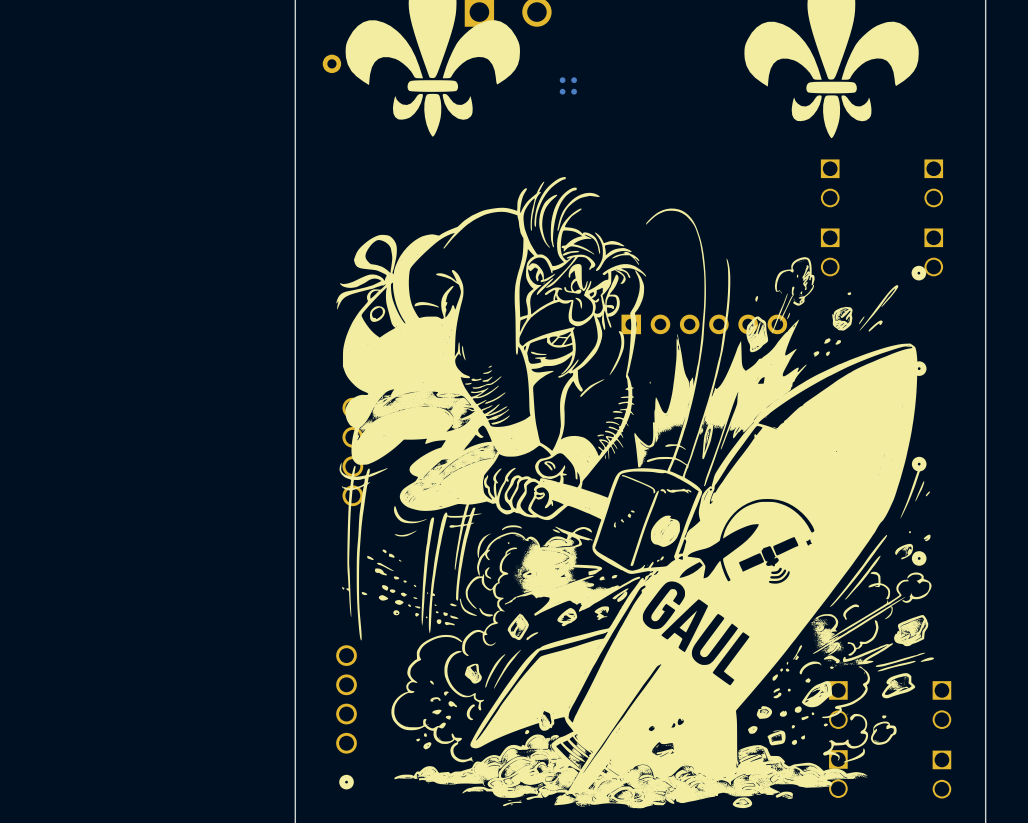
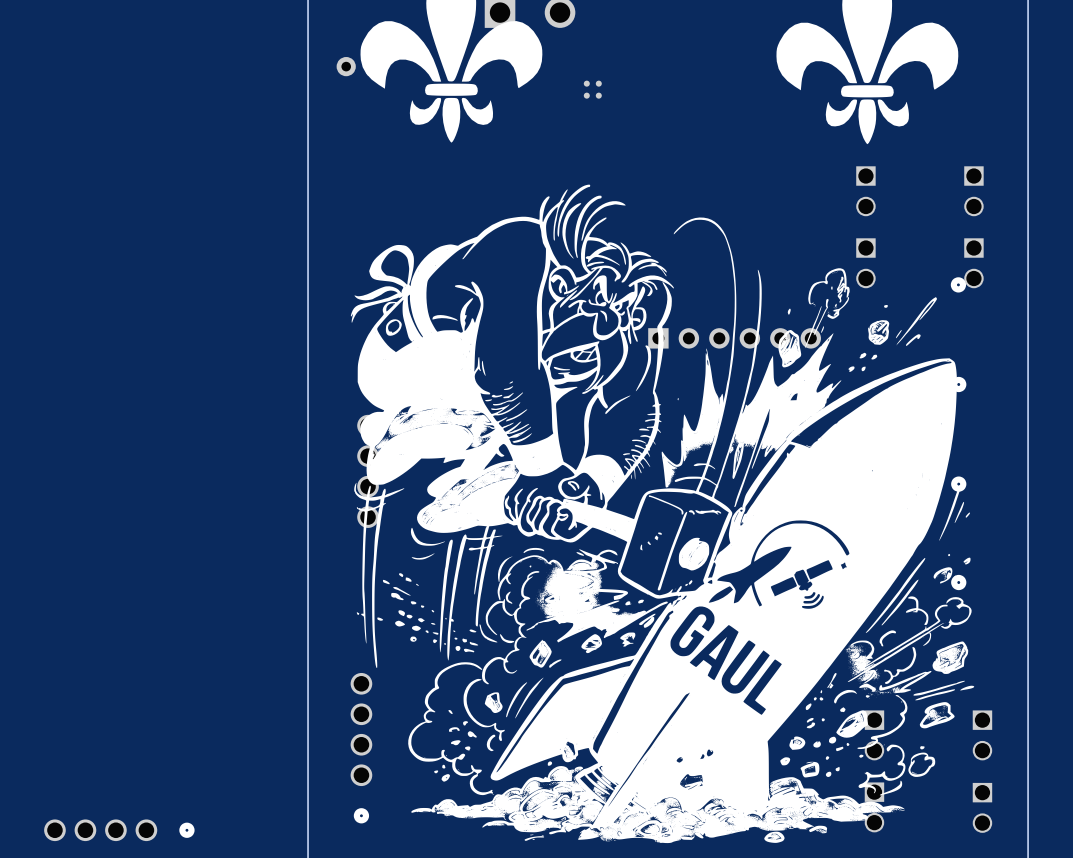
part: none -> (119, 830)

